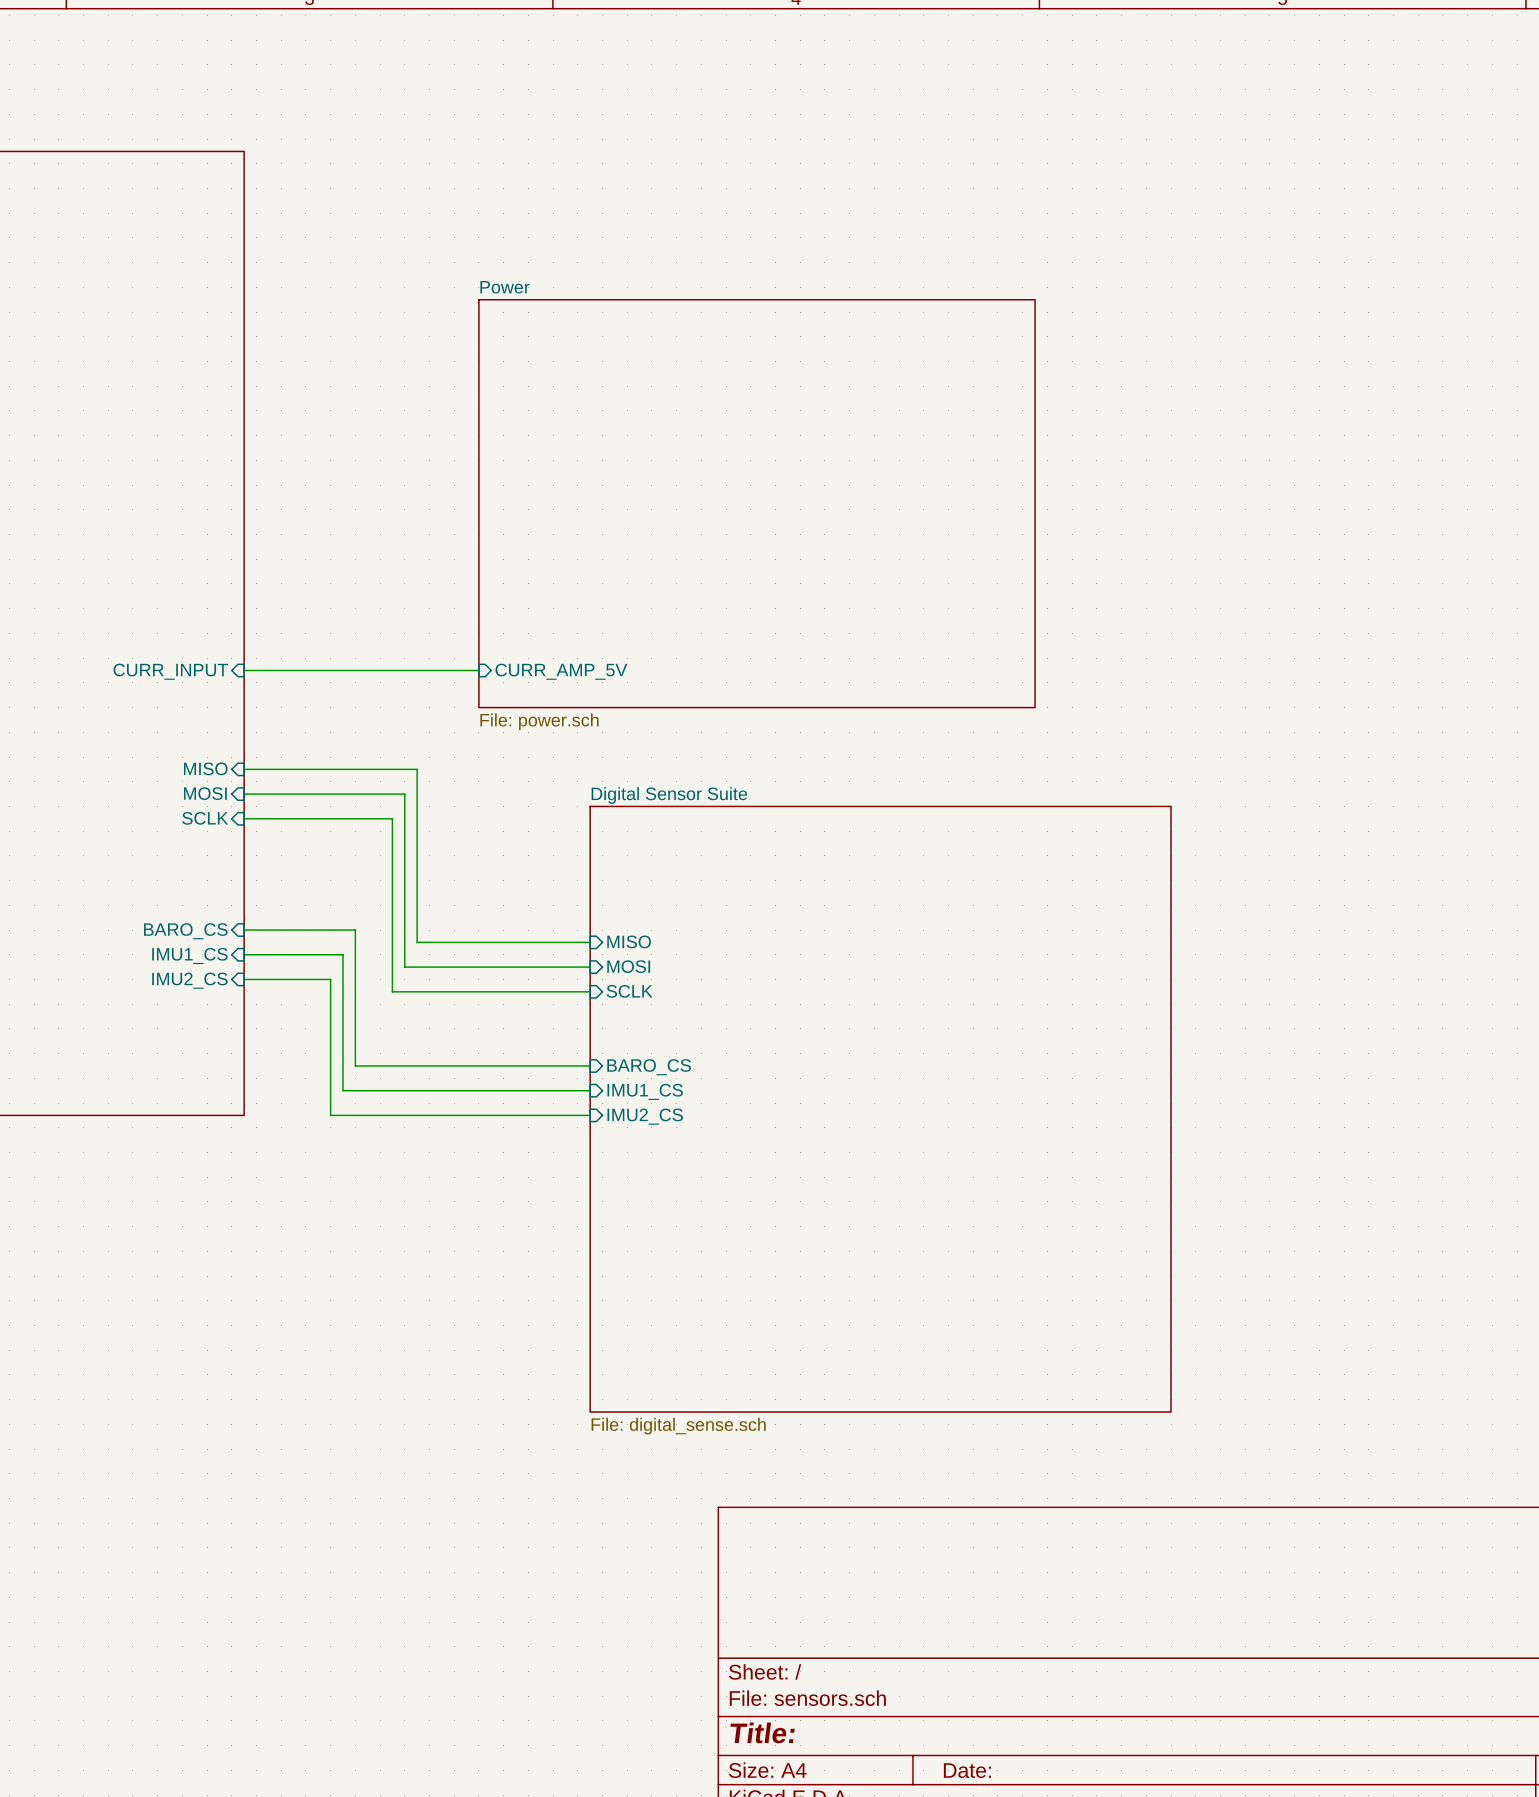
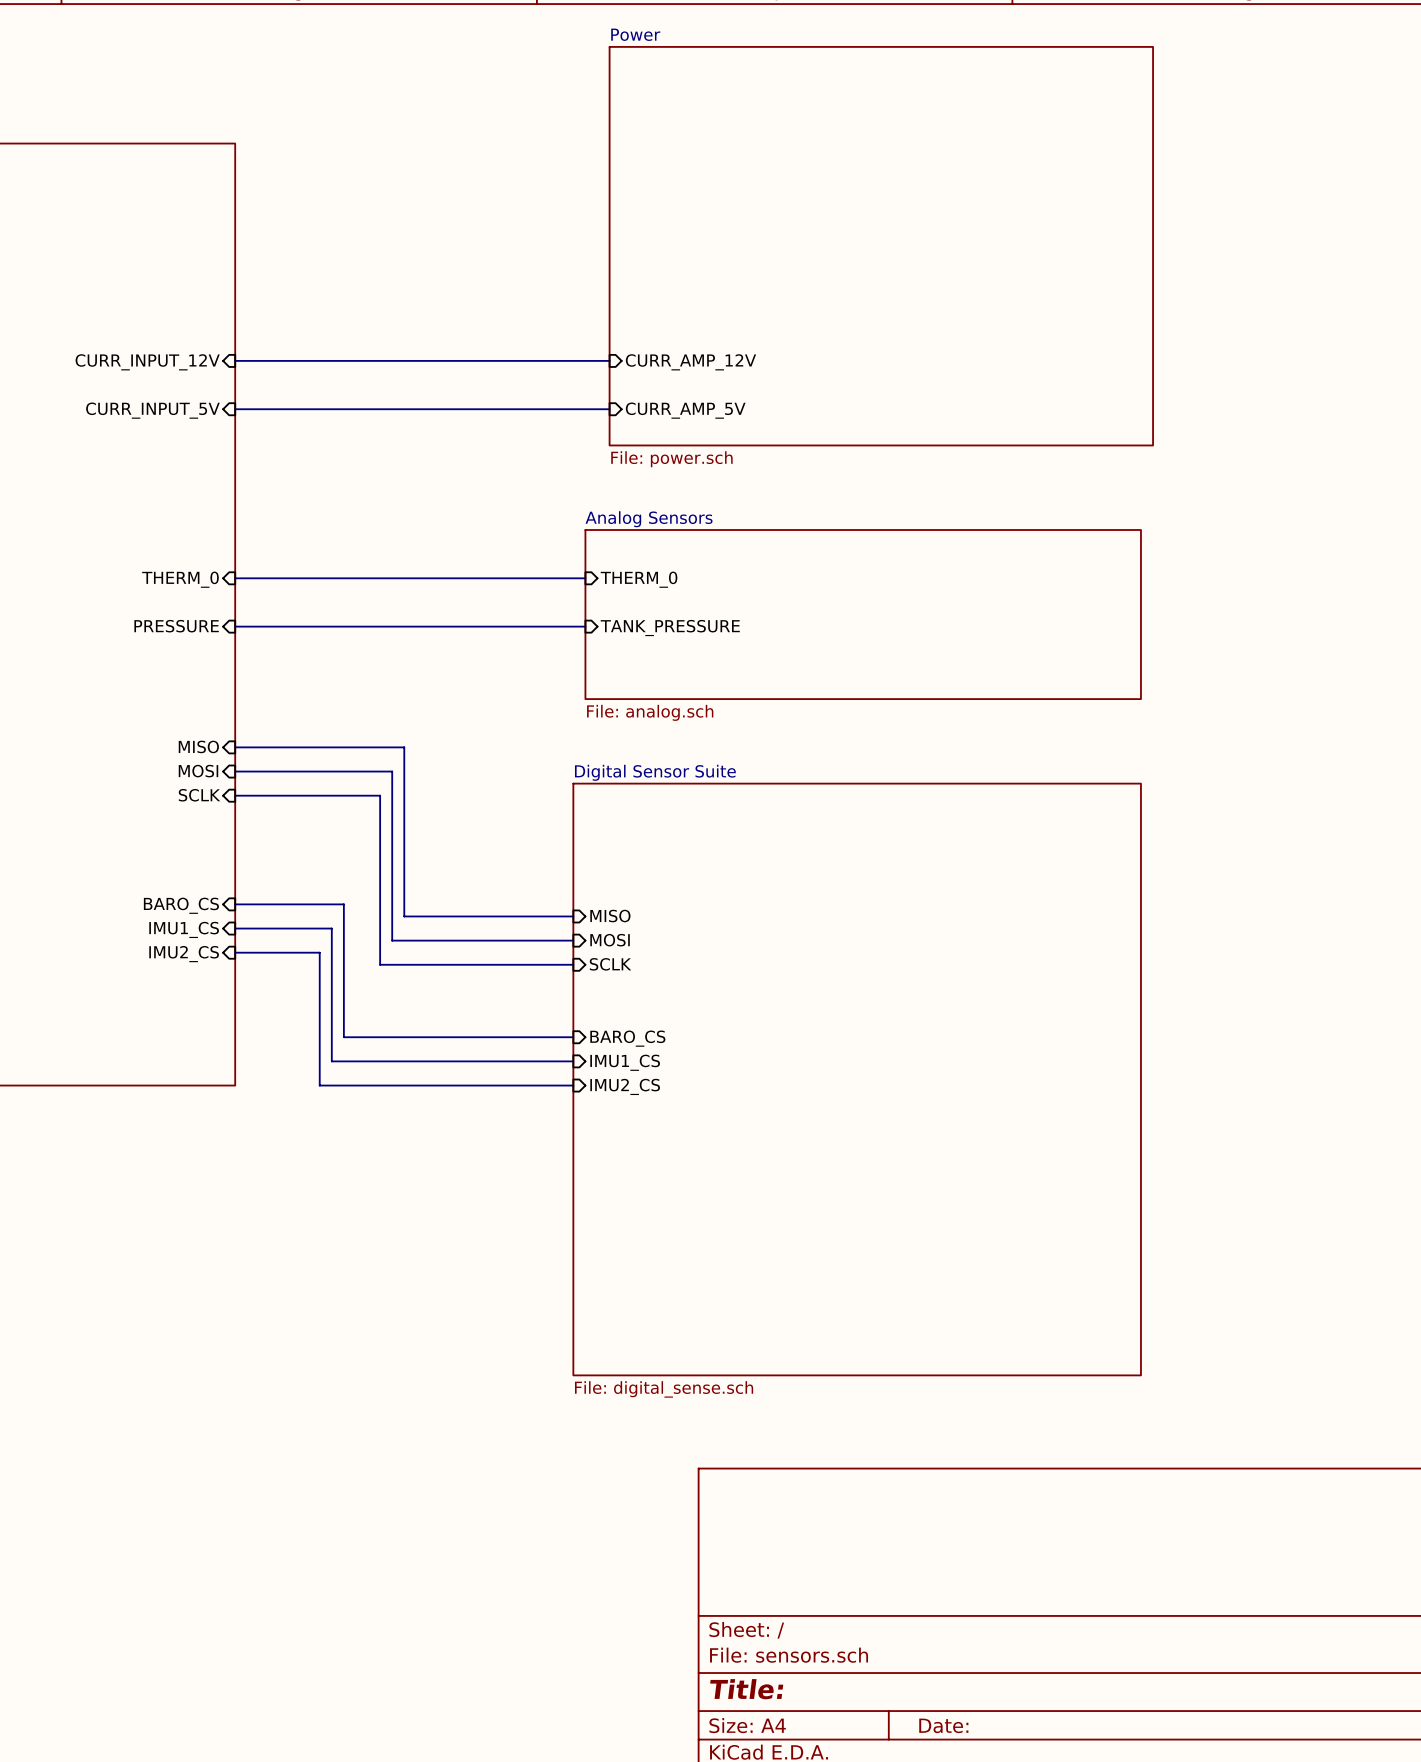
sheet Power: none -> File: power.sch (881, 246)
wire: none -> (235, 360) (609, 360)
sheet pin: none -> CURR_INPUT_12V (147, 362)
sheet pin: none -> CURR_AMP_12V (690, 362)
wire: none -> (235, 409) (609, 409)
sheet pin: none -> CURR_INPUT_5V (152, 410)
sheet pin: none -> CURR_AMP_5V (685, 410)
sheet Power: File: power.sch (756, 503) -> none
wire: none -> (235, 578) (585, 578)
sheet pin: none -> THERM_0 (180, 579)
sheet pin: none -> THERM_0 (639, 579)
sheet Analog Sensors: none -> File: analog.sch (863, 614)
sheet pin: none -> PRESSURE (176, 626)
wire: none -> (235, 626) (585, 626)
sheet pin: none -> TANK_PRESSURE (670, 628)
wire: (244, 670) (478, 670) -> none
sheet pin: CURR_INPUT (170, 671) -> none
sheet pin: CURR_AMP_5V (561, 671) -> none

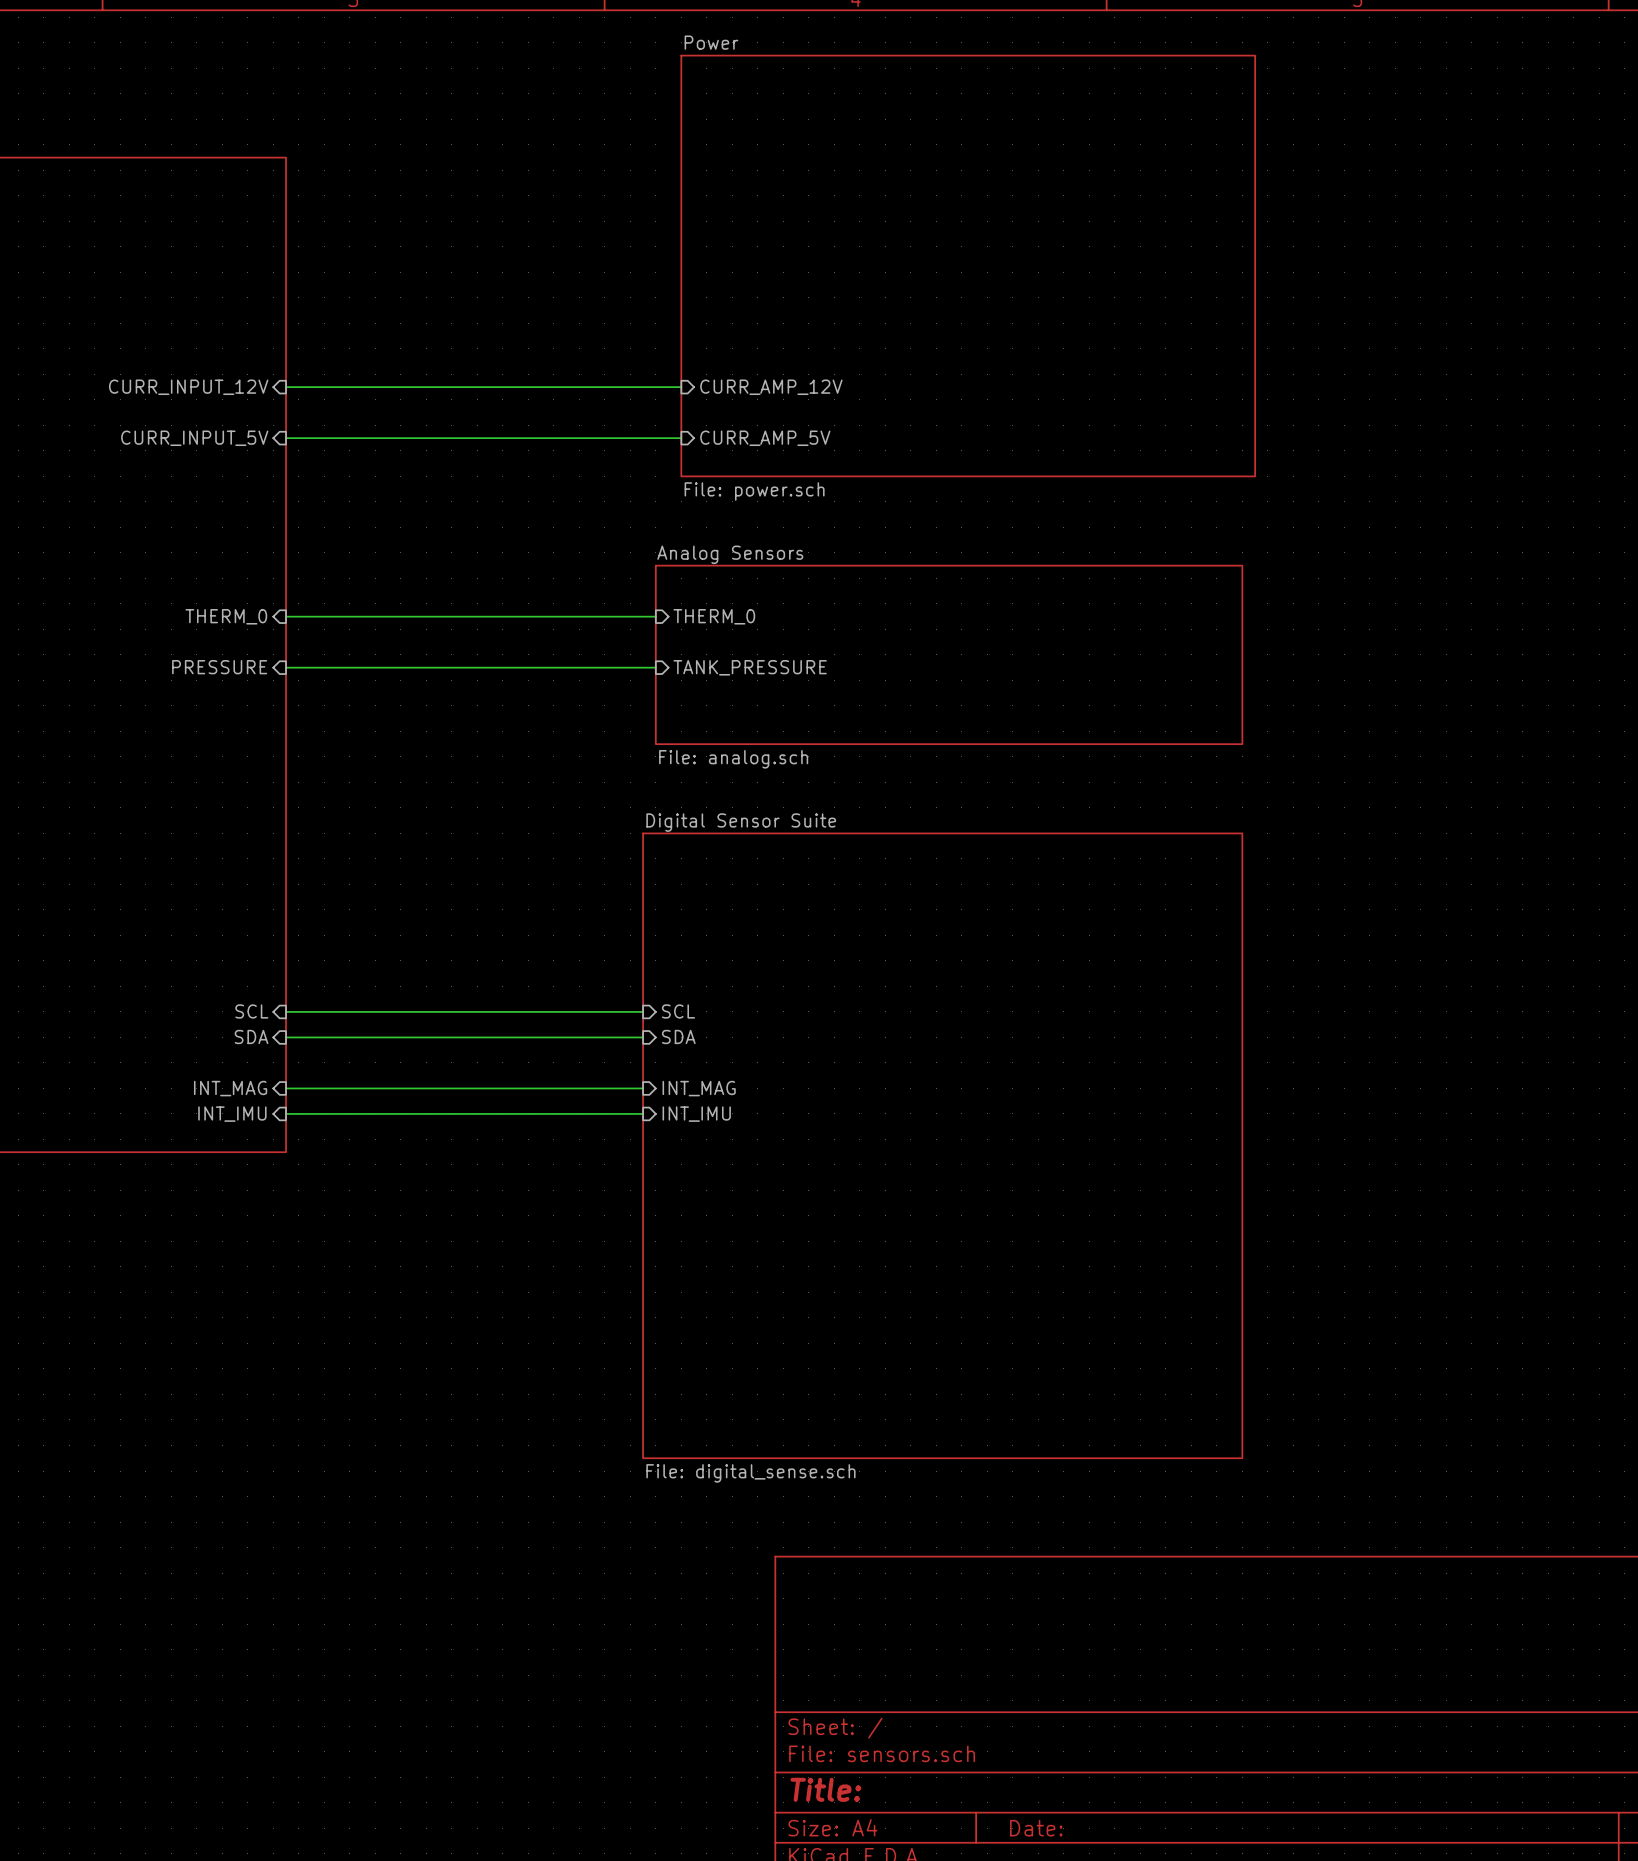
sheet pin: MISO (198, 746) -> none
wire: (235, 747) (404, 747) (404, 916) (573, 916) -> none
sheet pin: MOSI (198, 771) -> none
wire: (235, 771) (392, 771) (392, 940) (573, 940) -> none
sheet pin: SCLK (199, 795) -> none
wire: (235, 795) (380, 795) (380, 964) (573, 964) -> none
wire: (235, 904) (343, 904) (343, 1037) (573, 1037) -> none
sheet pin: BARO_CS (181, 905) -> none
sheet pin: MISO (610, 916) -> none
wire: (235, 928) (331, 928) (331, 1061) (573, 1061) -> none
sheet pin: IMU1_CS (184, 929) -> none
sheet pin: MOSI (610, 940) -> none
wire: (319, 952) (319, 1085) (573, 1085) -> (375, 1011) (643, 1011)
sheet pin: IMU2_CS (184, 954) -> SCL (251, 1011)
sheet pin: SCLK (610, 964) -> SCL (678, 1011)
sheet pin: none -> SDA (251, 1036)
wire: none -> (286, 1037) (643, 1037)
sheet pin: none -> SDA (678, 1036)
wire: none -> (286, 1088) (643, 1088)
sheet pin: none -> INT_MAG (230, 1088)
sheet pin: none -> INT_MAG (699, 1088)
sheet pin: BARO_CS (627, 1038) -> none
wire: none -> (286, 1113) (643, 1113)
sheet pin: none -> INT_IMU (232, 1114)
sheet pin: none -> INT_IMU (696, 1114)
sheet pin: IMU1_CS (625, 1062) -> none
sheet pin: IMU2_CS (625, 1086) -> none

